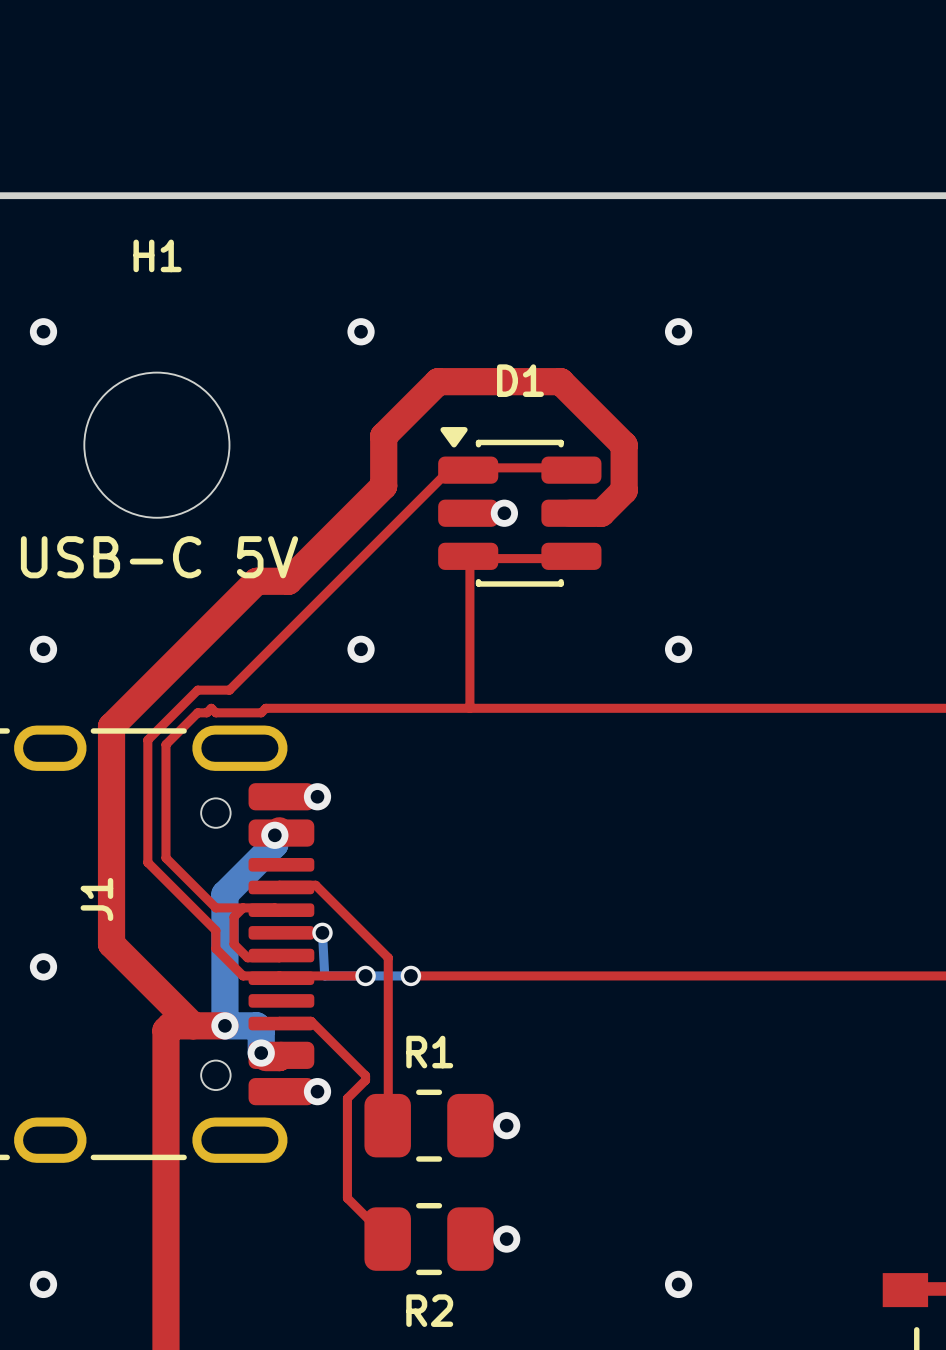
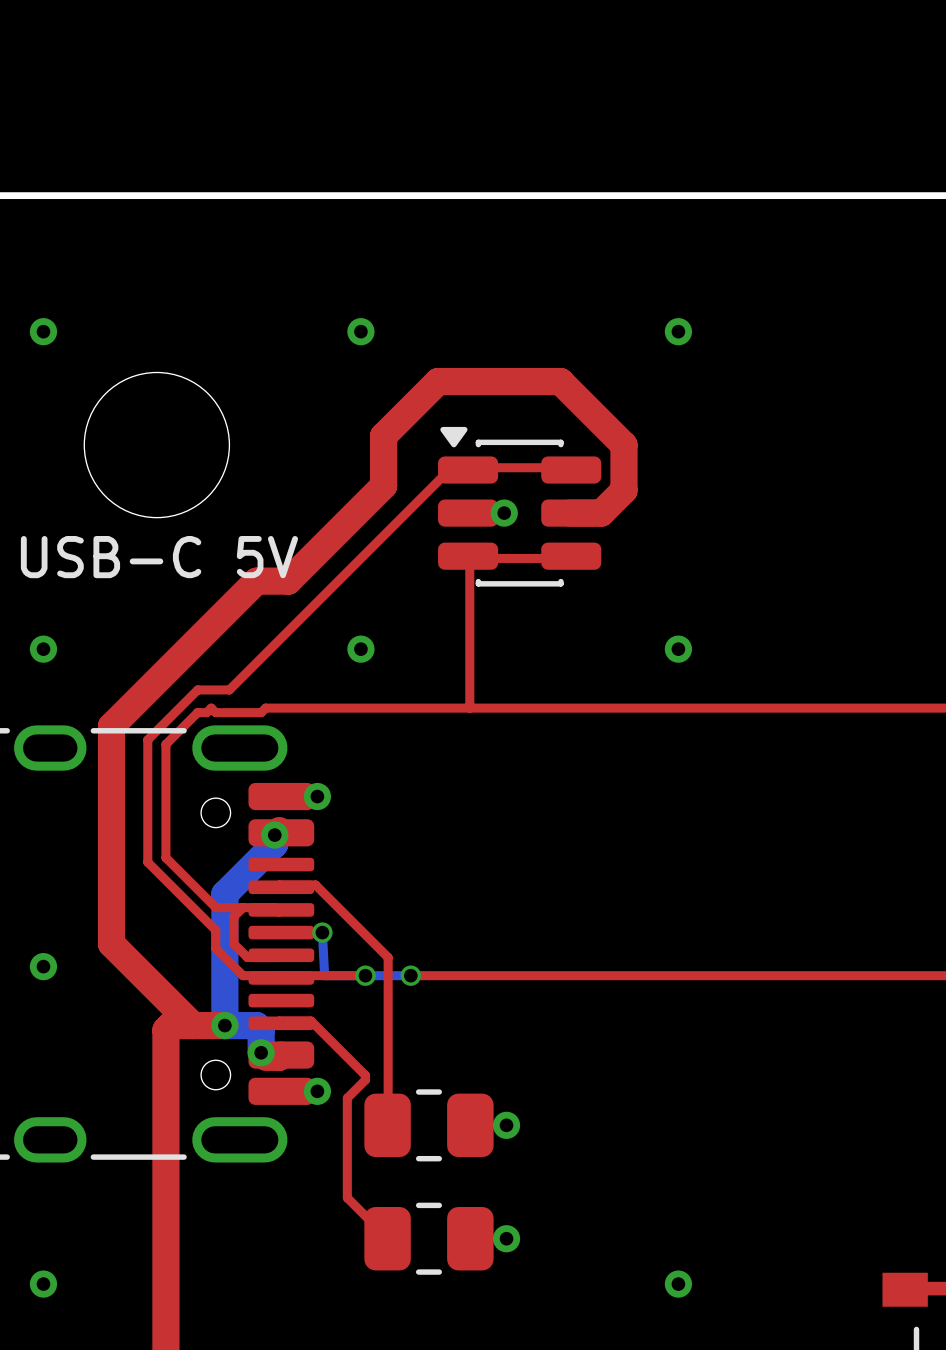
H1 name: H1 (157, 255) -> none
D1 name: D1 (520, 380) -> none
J1 name: J1 (96, 899) -> none
R1 name: R1 (429, 1052) -> none
R2 name: R2 (429, 1310) -> none

